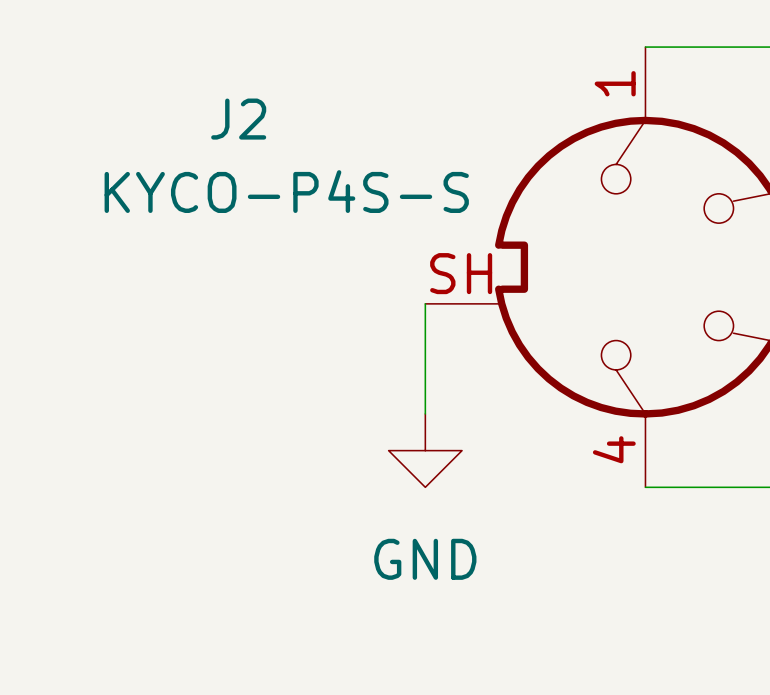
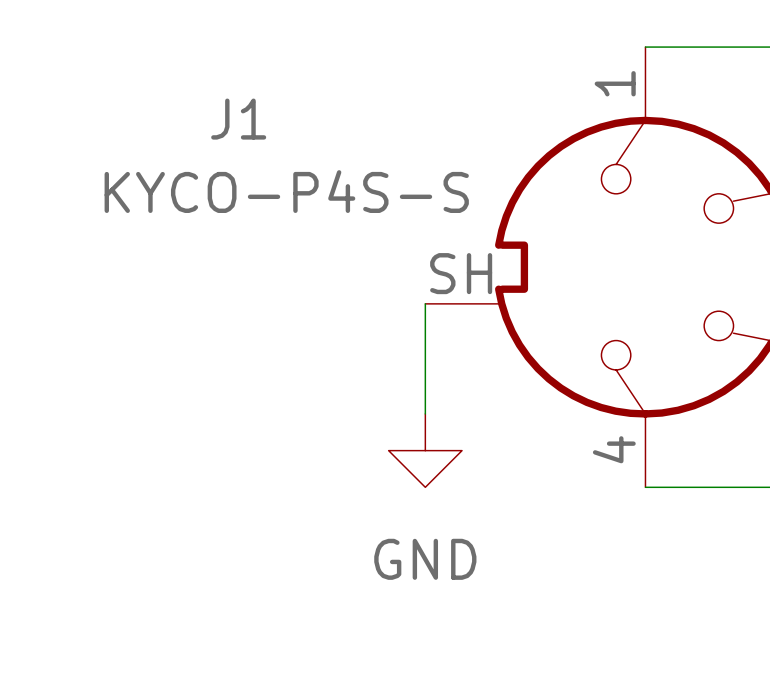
J2 name: J2 (238, 119) -> J1 (238, 119)

